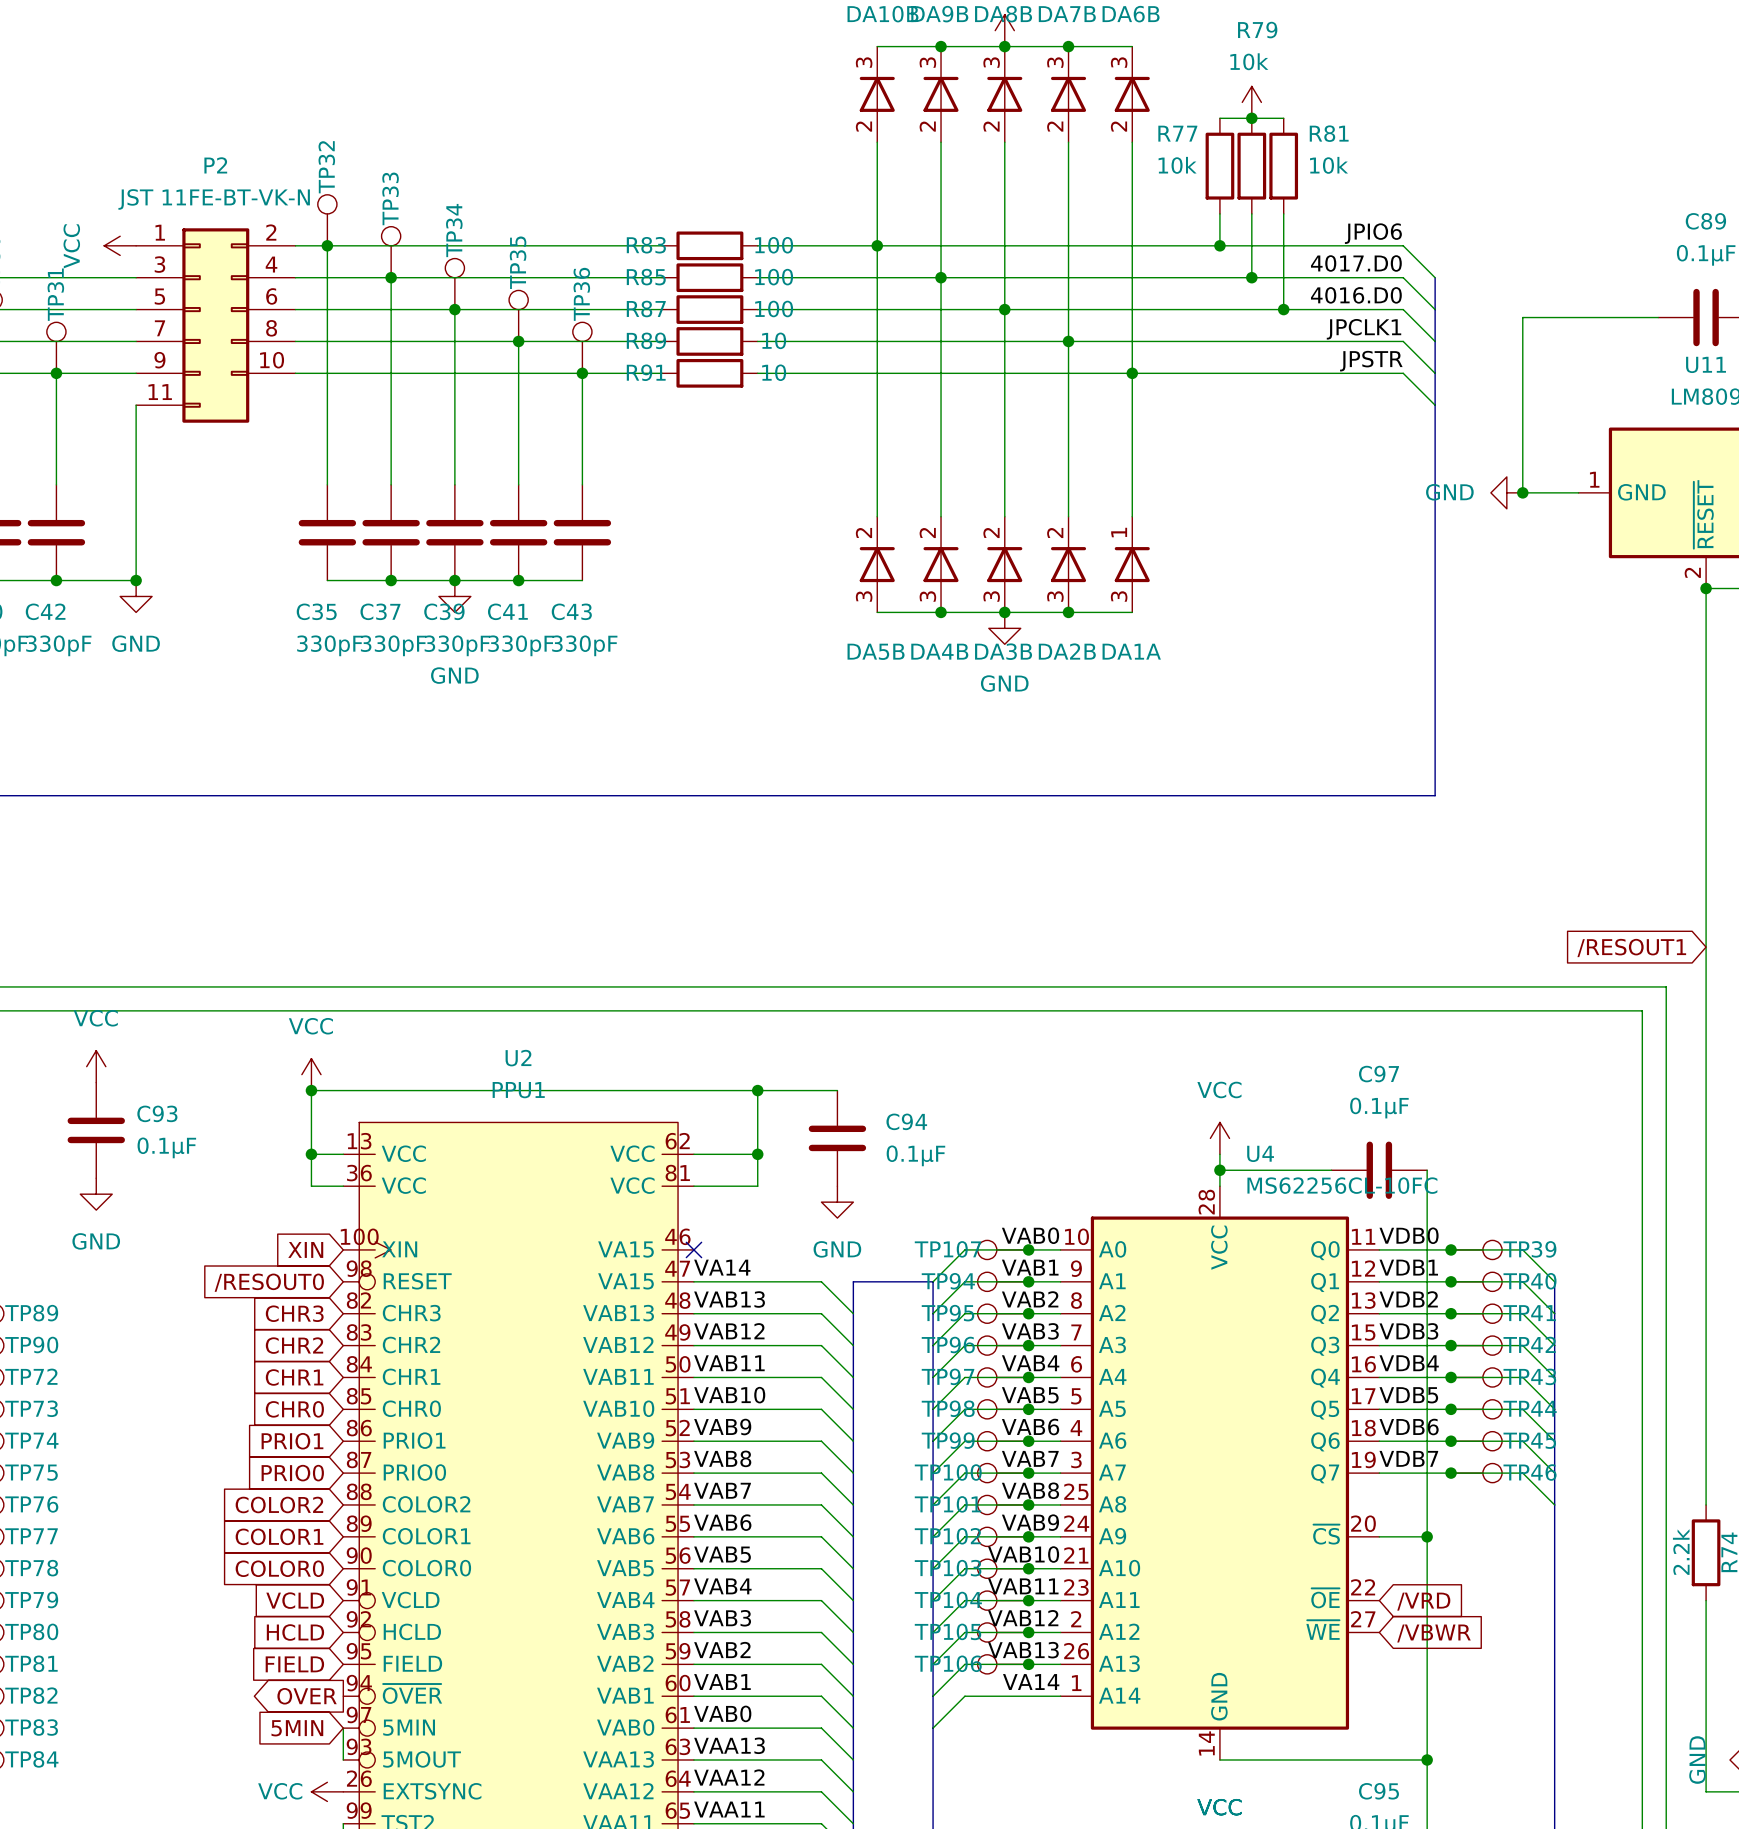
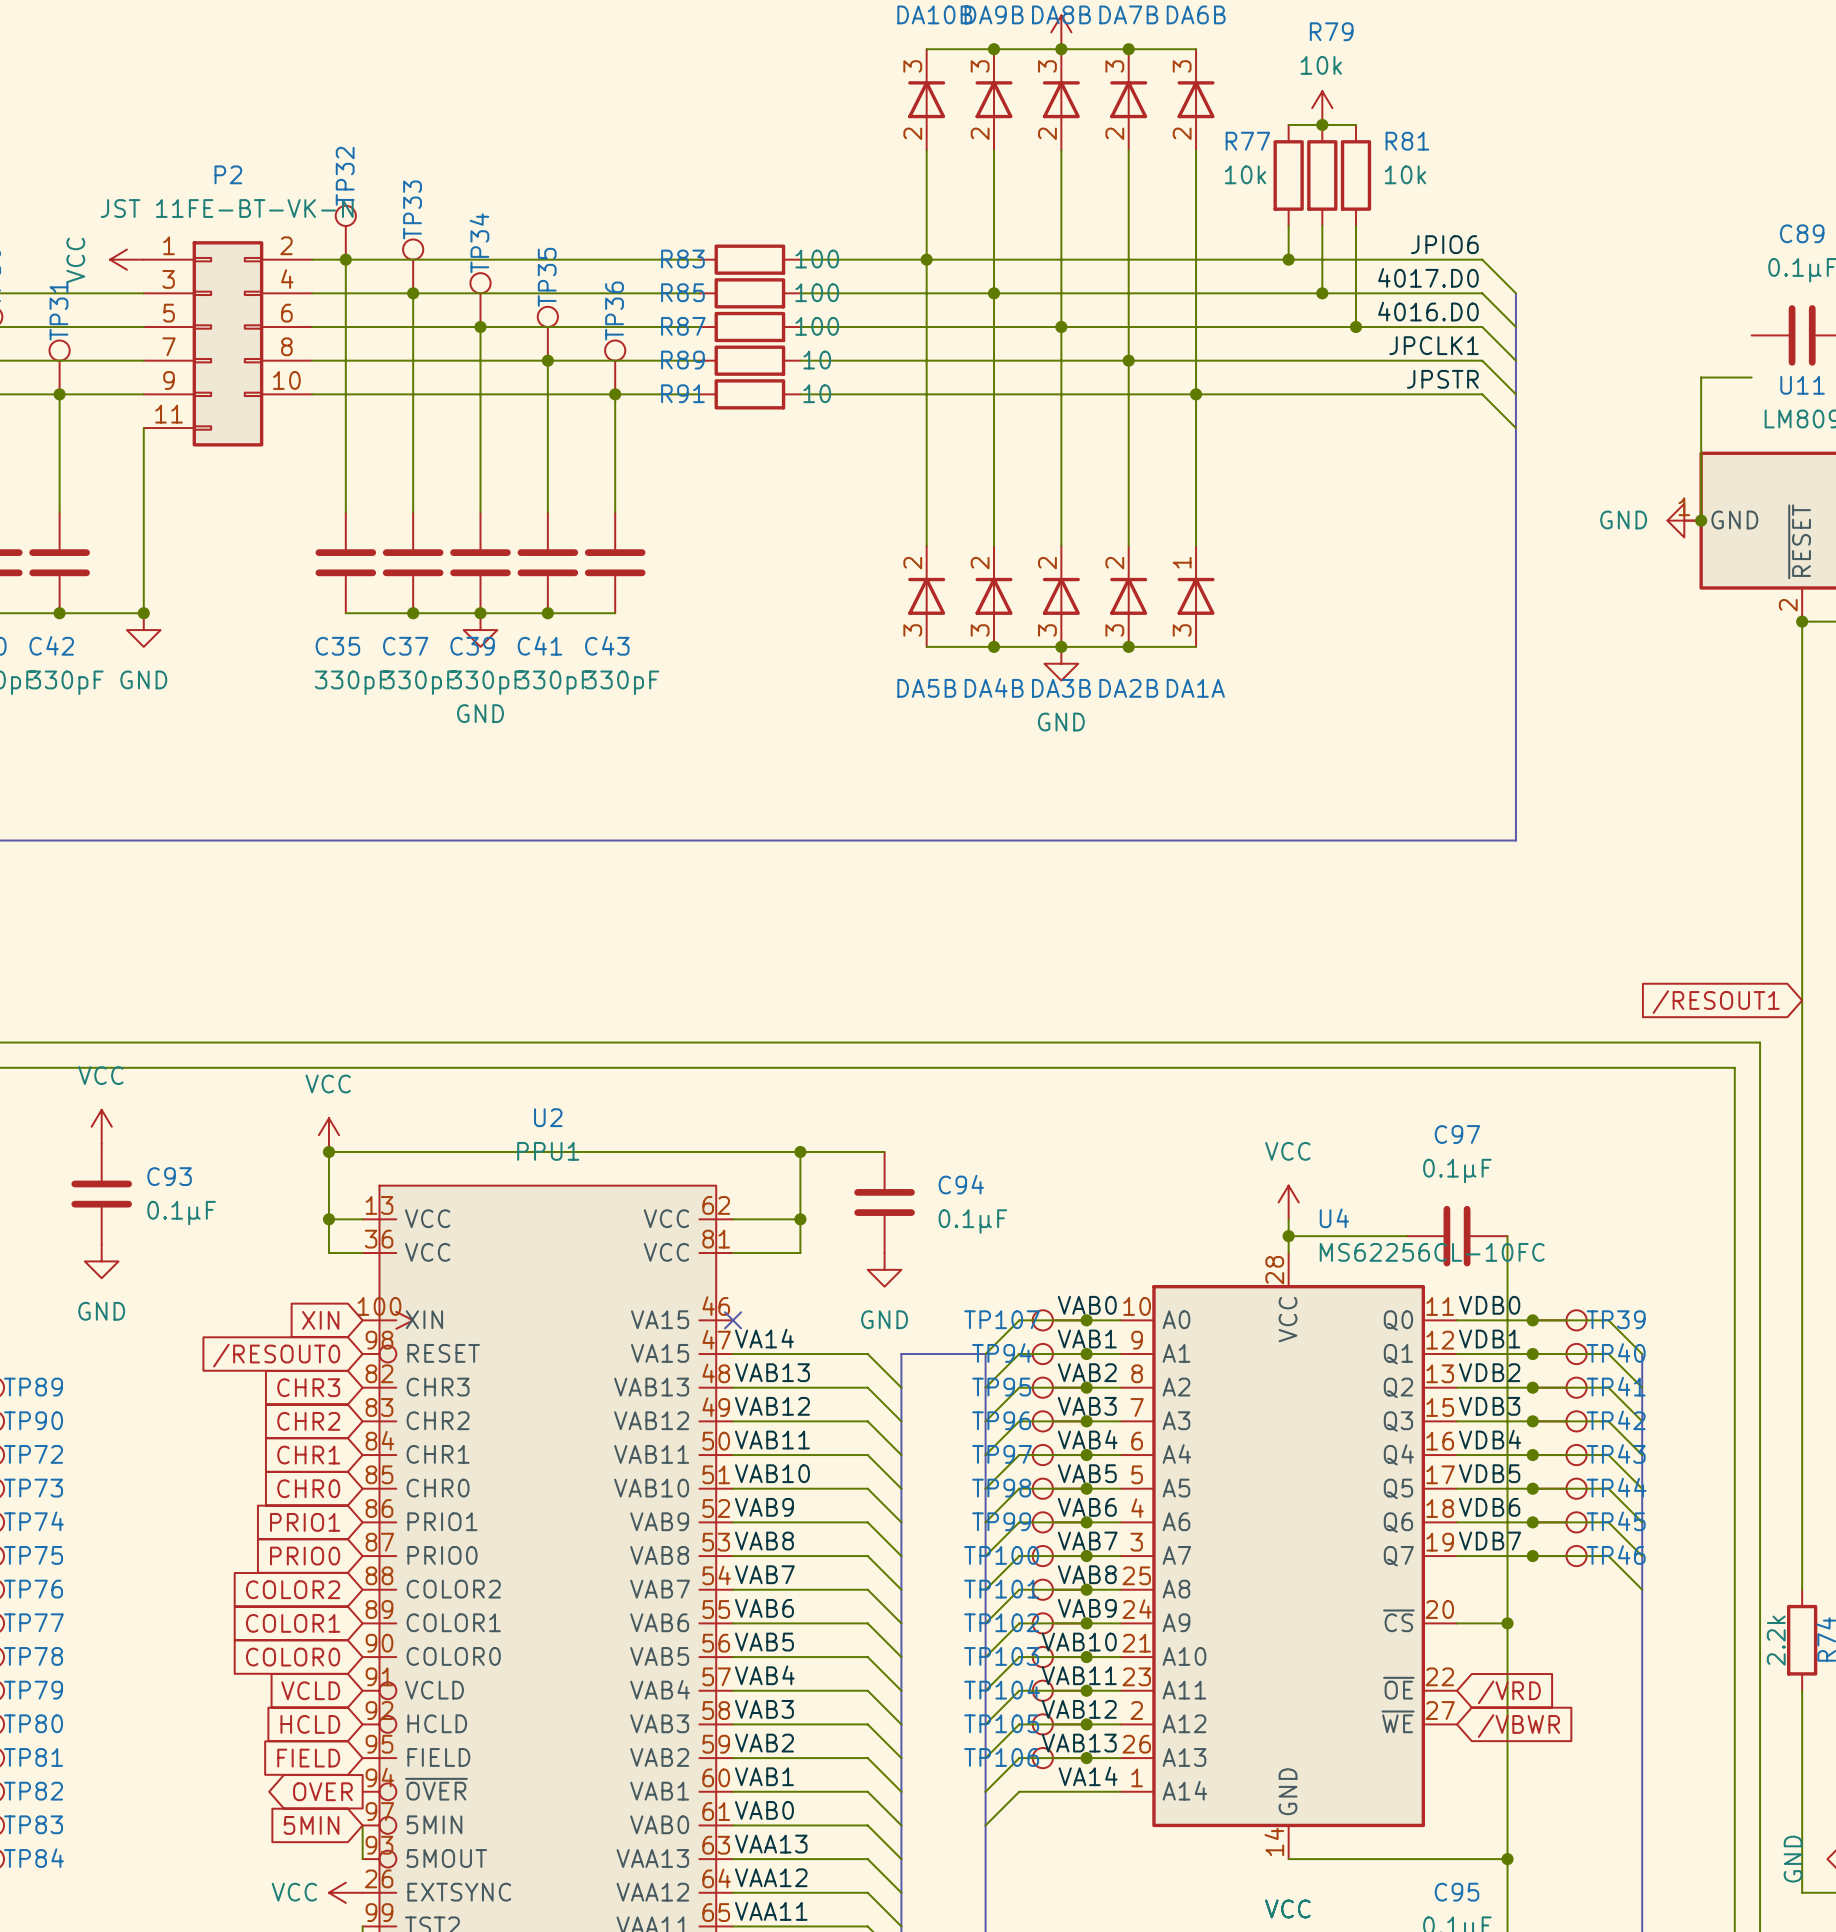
wire: (1658, 317) (1522, 317) (1522, 492) (1578, 492) -> none
wire: none -> (1751, 377) (1701, 377) (1701, 520)
power symbol position: GND (1506, 492) -> GND (1684, 520)
junction: (1522, 492) -> none
junction: none -> (1701, 520)

